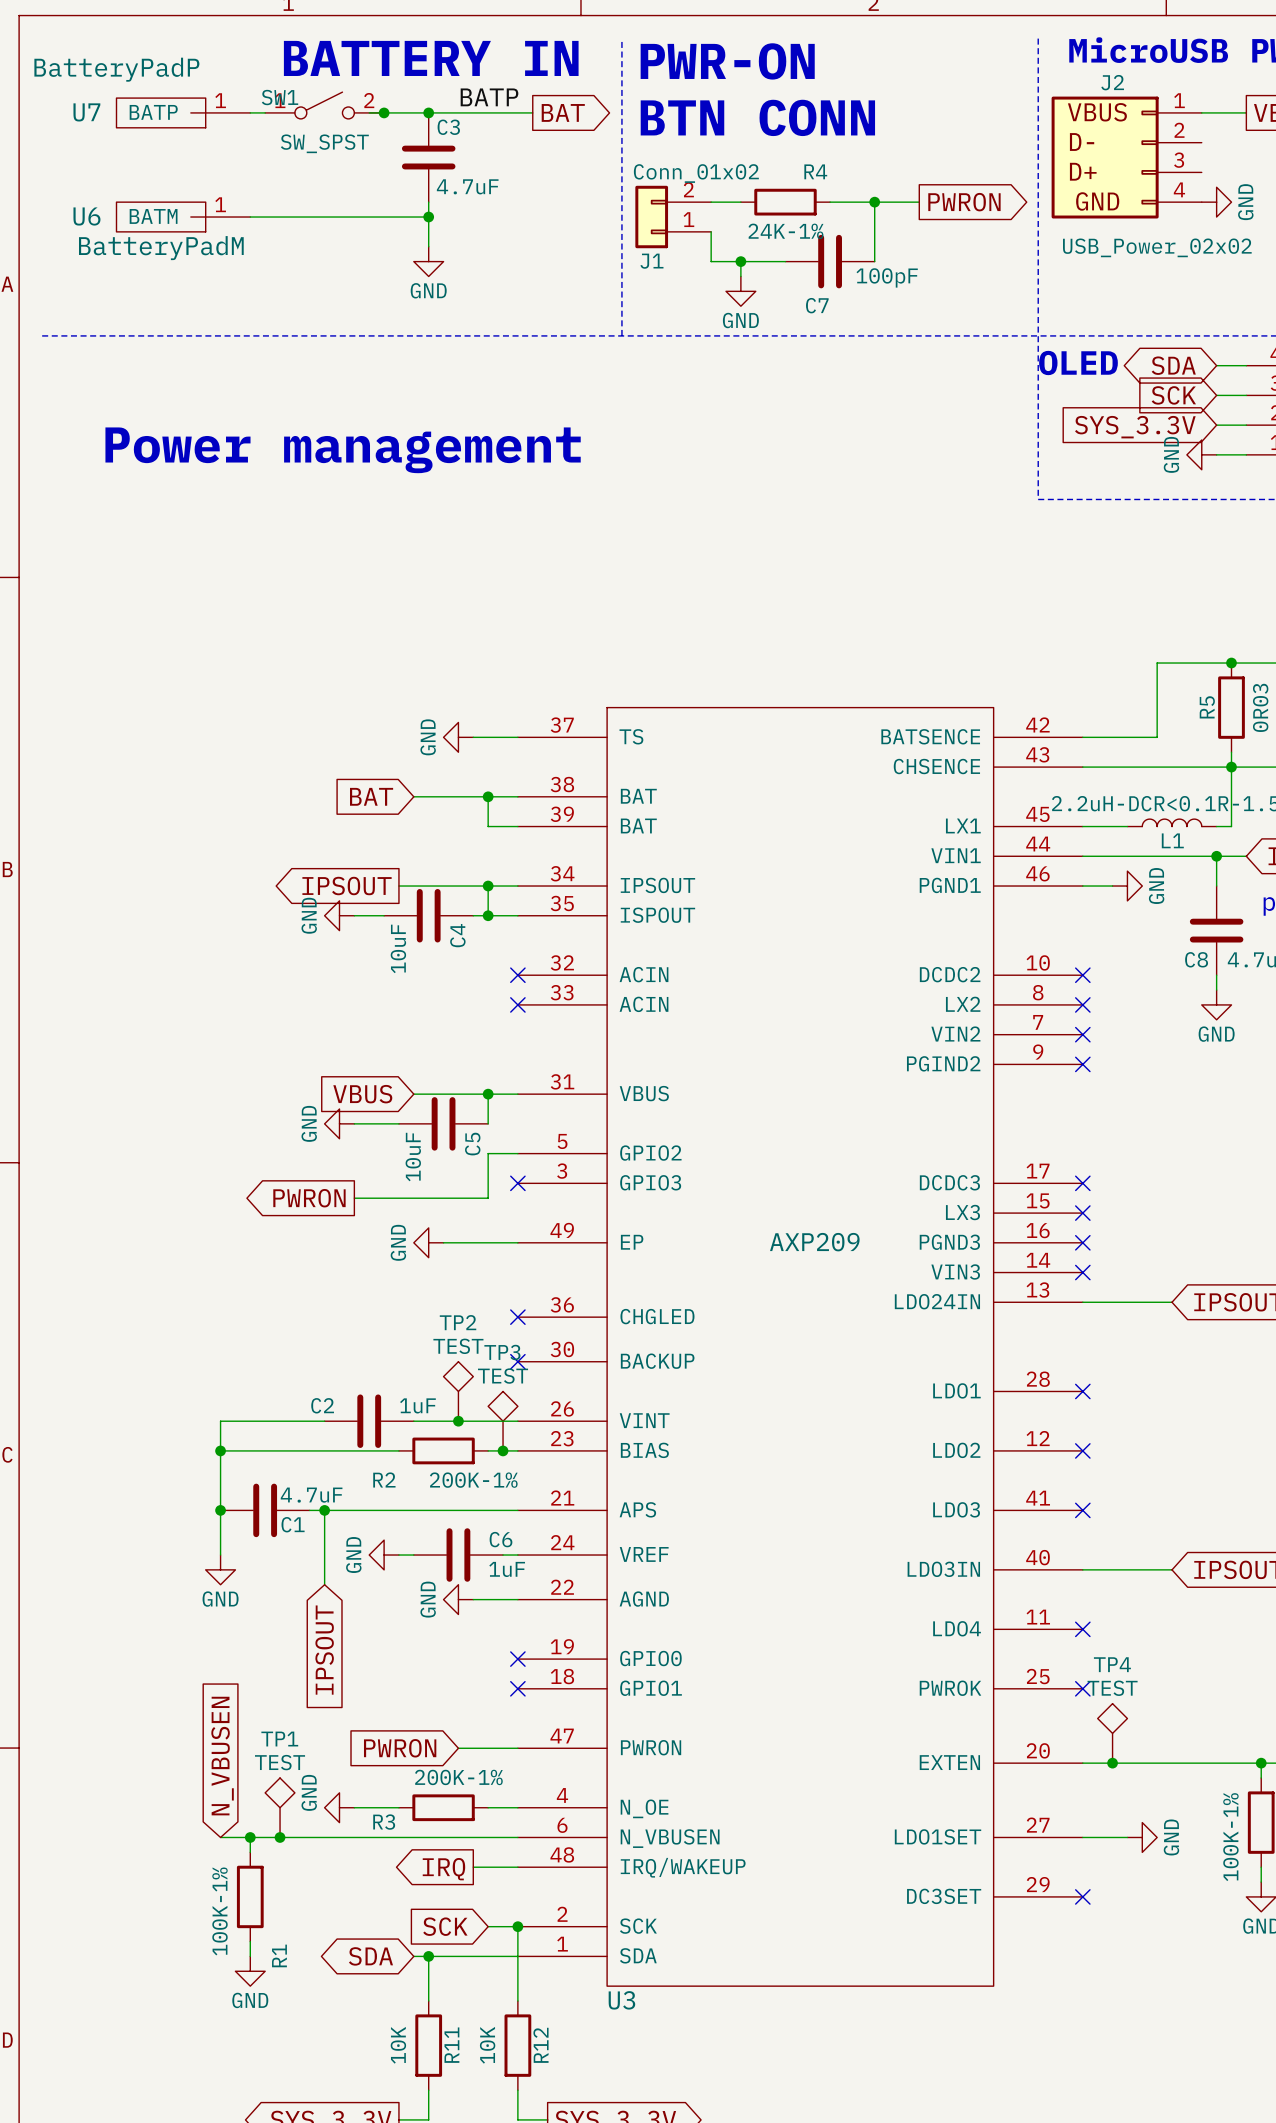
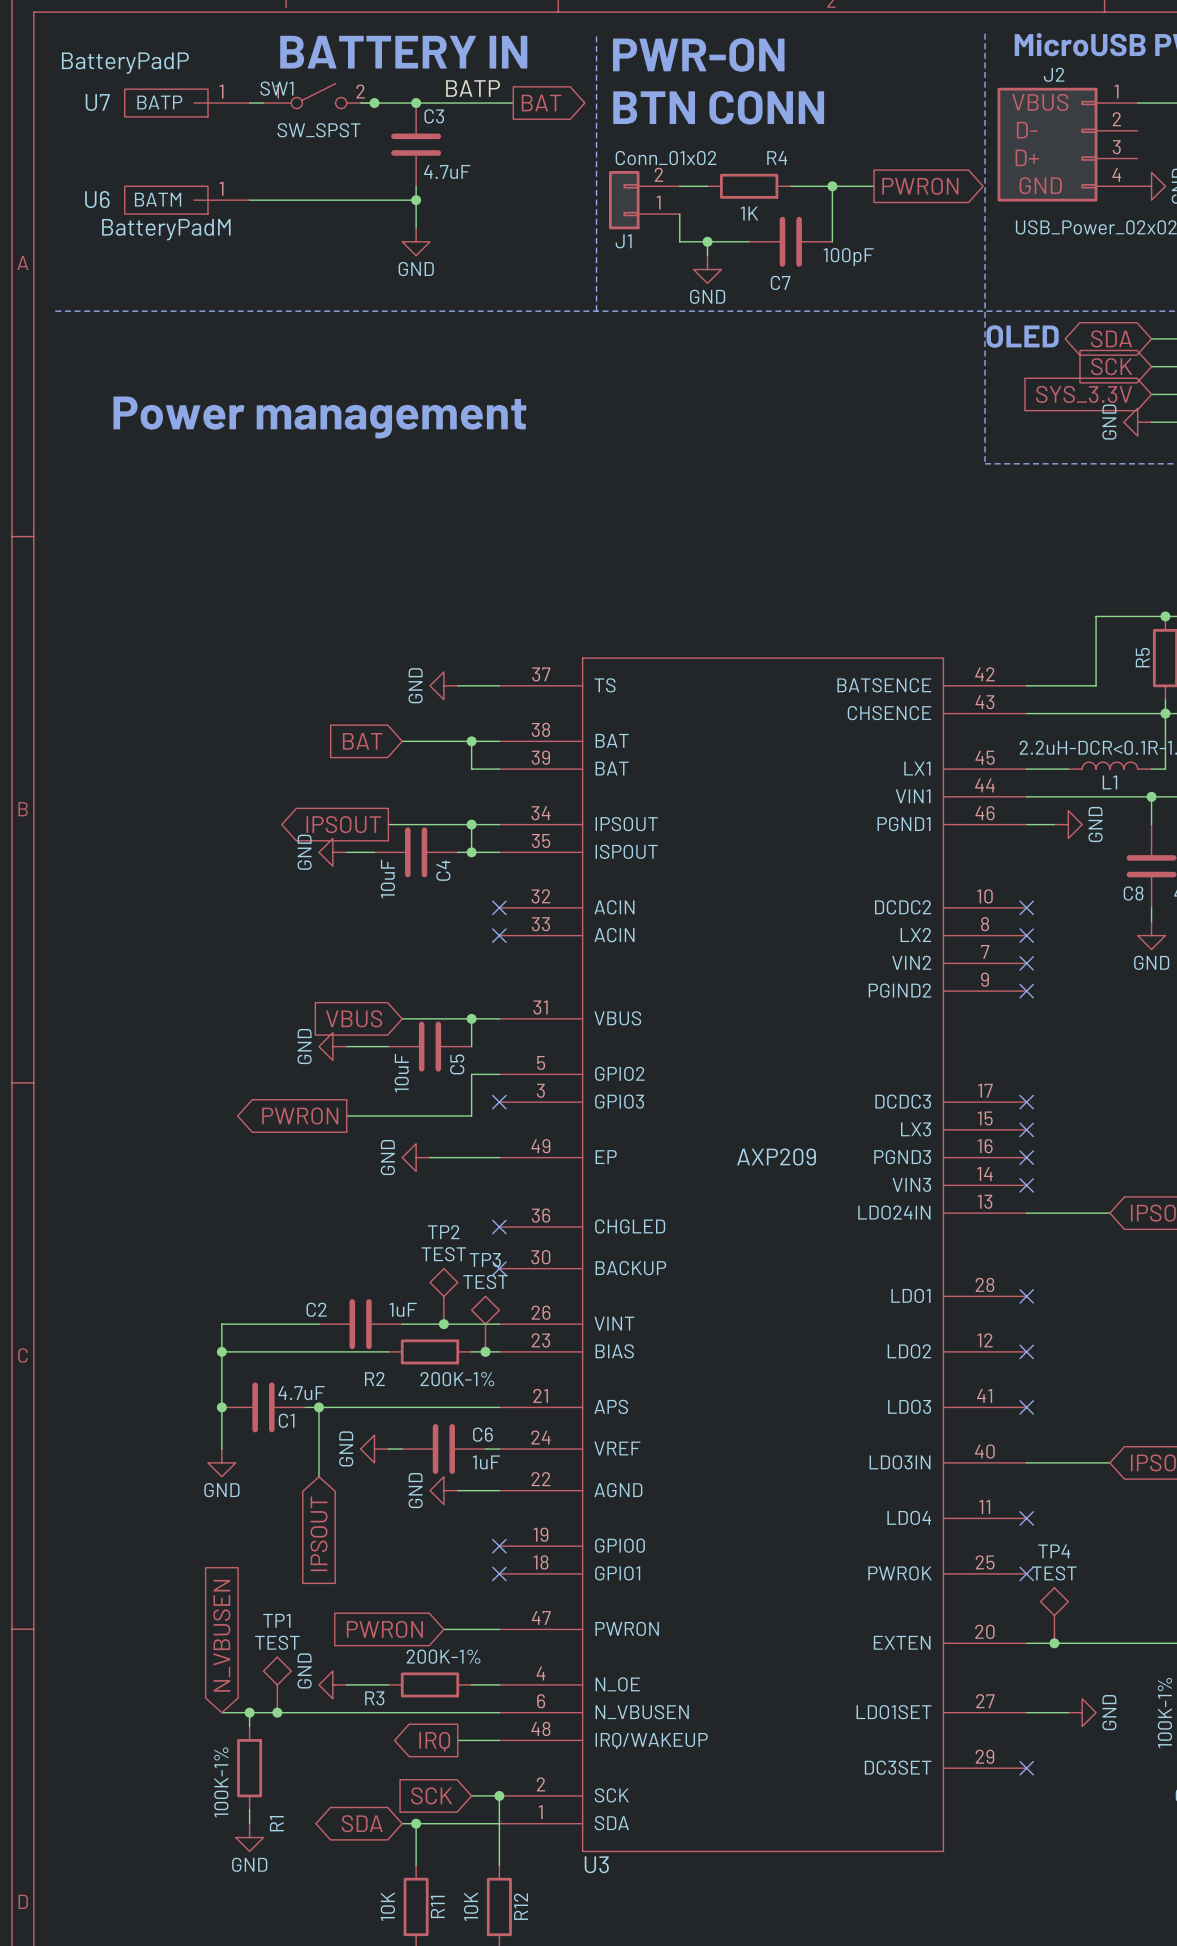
R4 value: 24K-1% (785, 231) -> 1K (749, 213)

